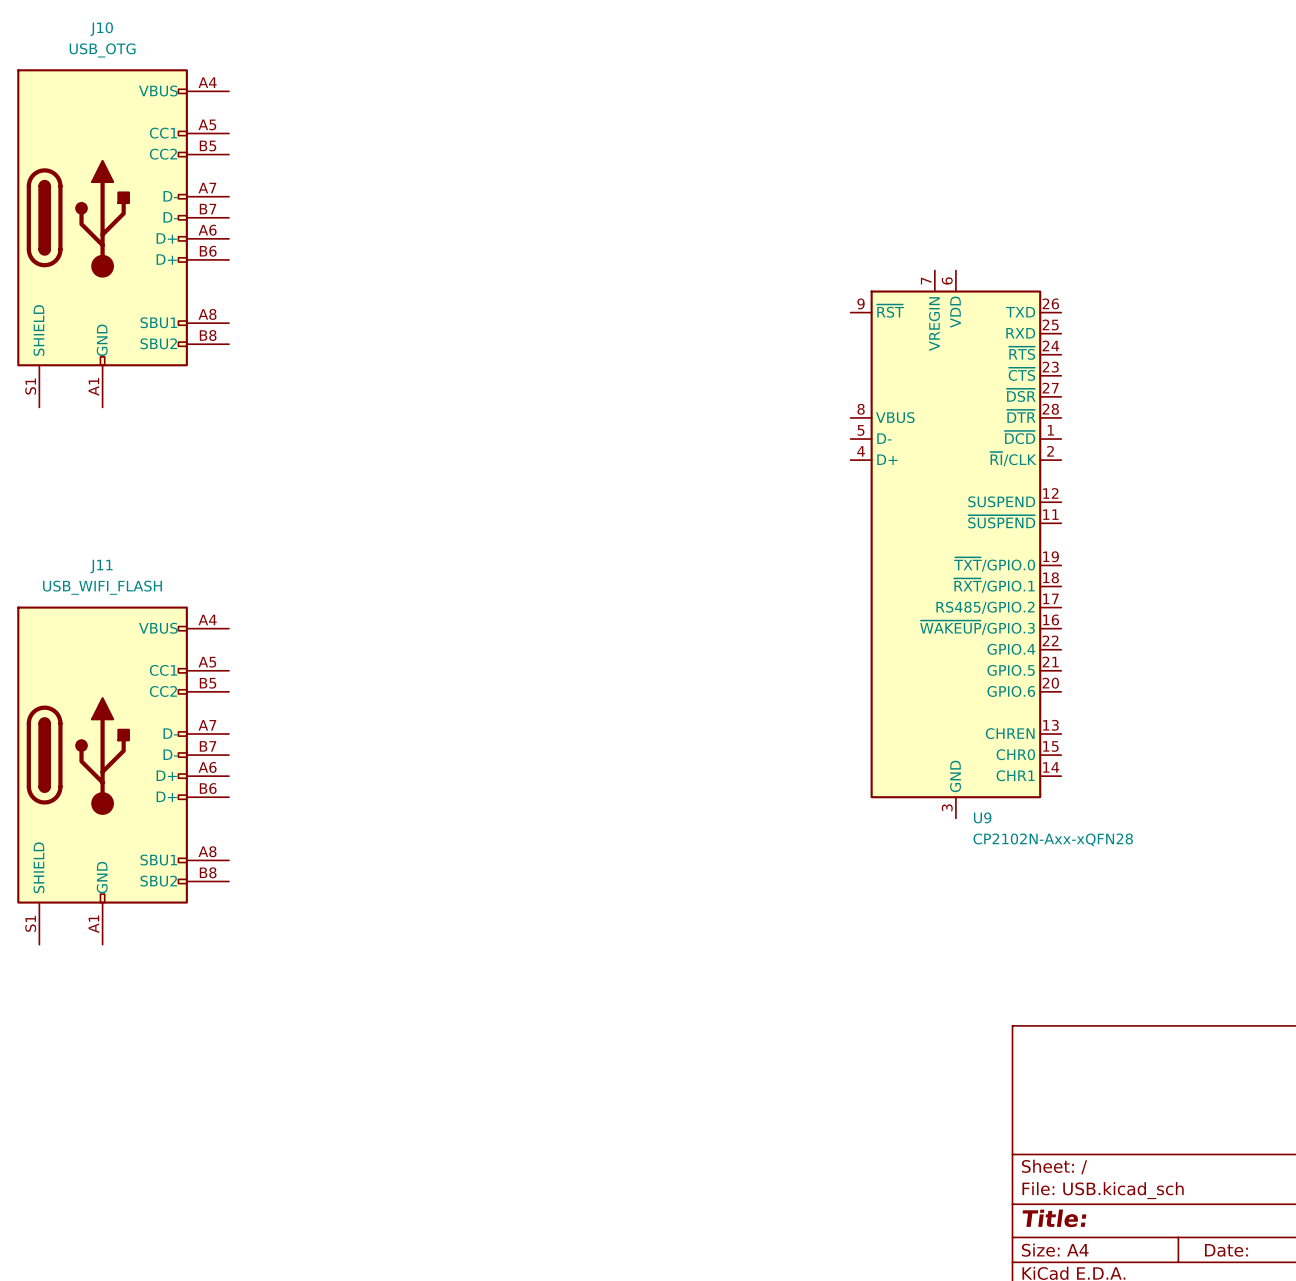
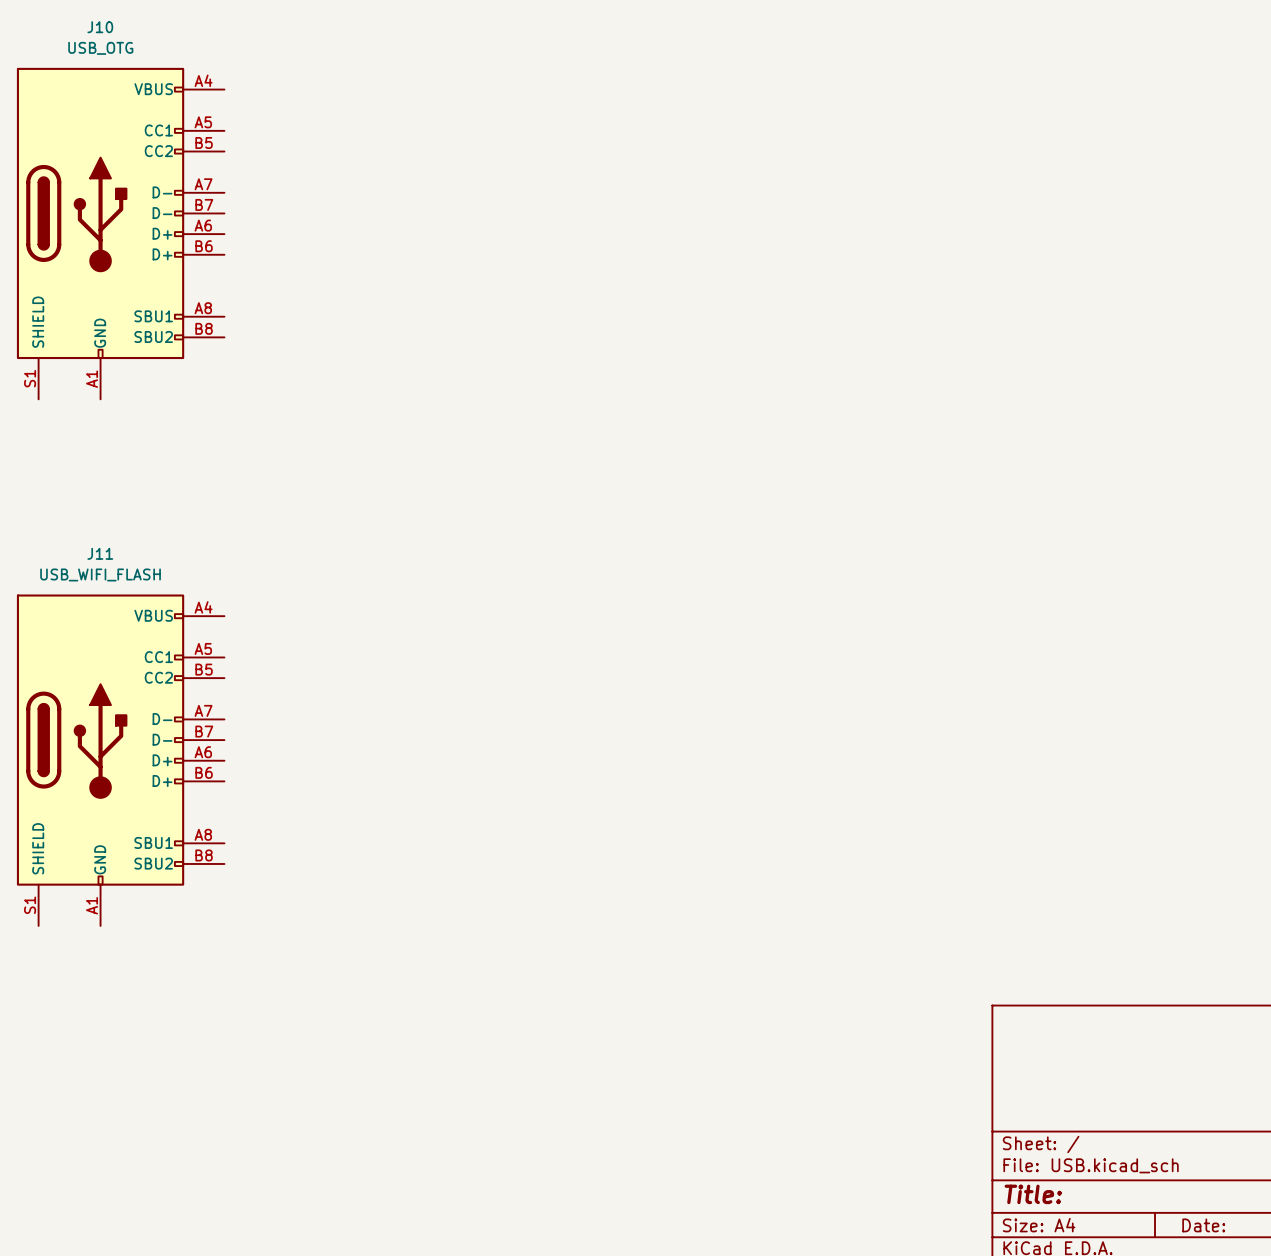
U9: CP2102N-Axx-xQFN28 (955, 544) -> none

